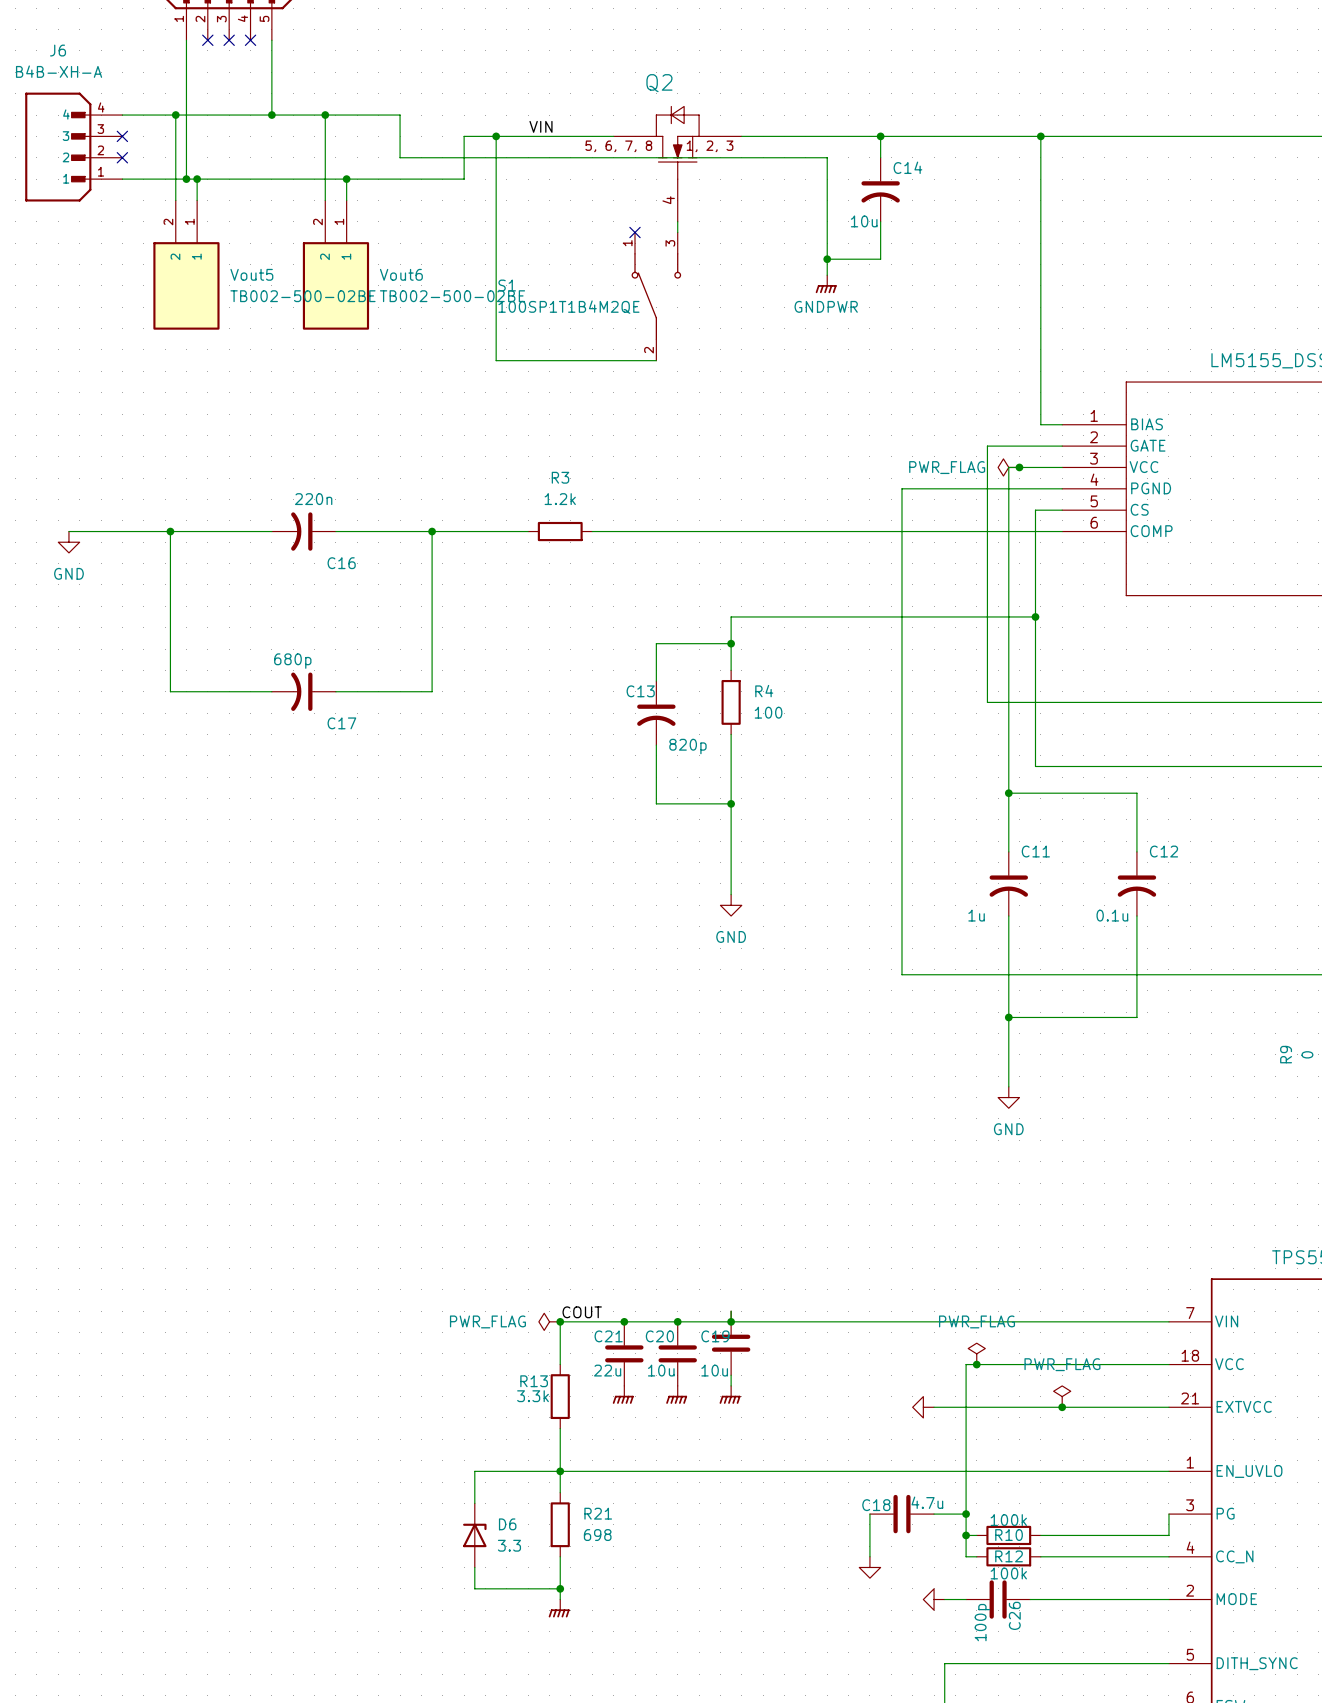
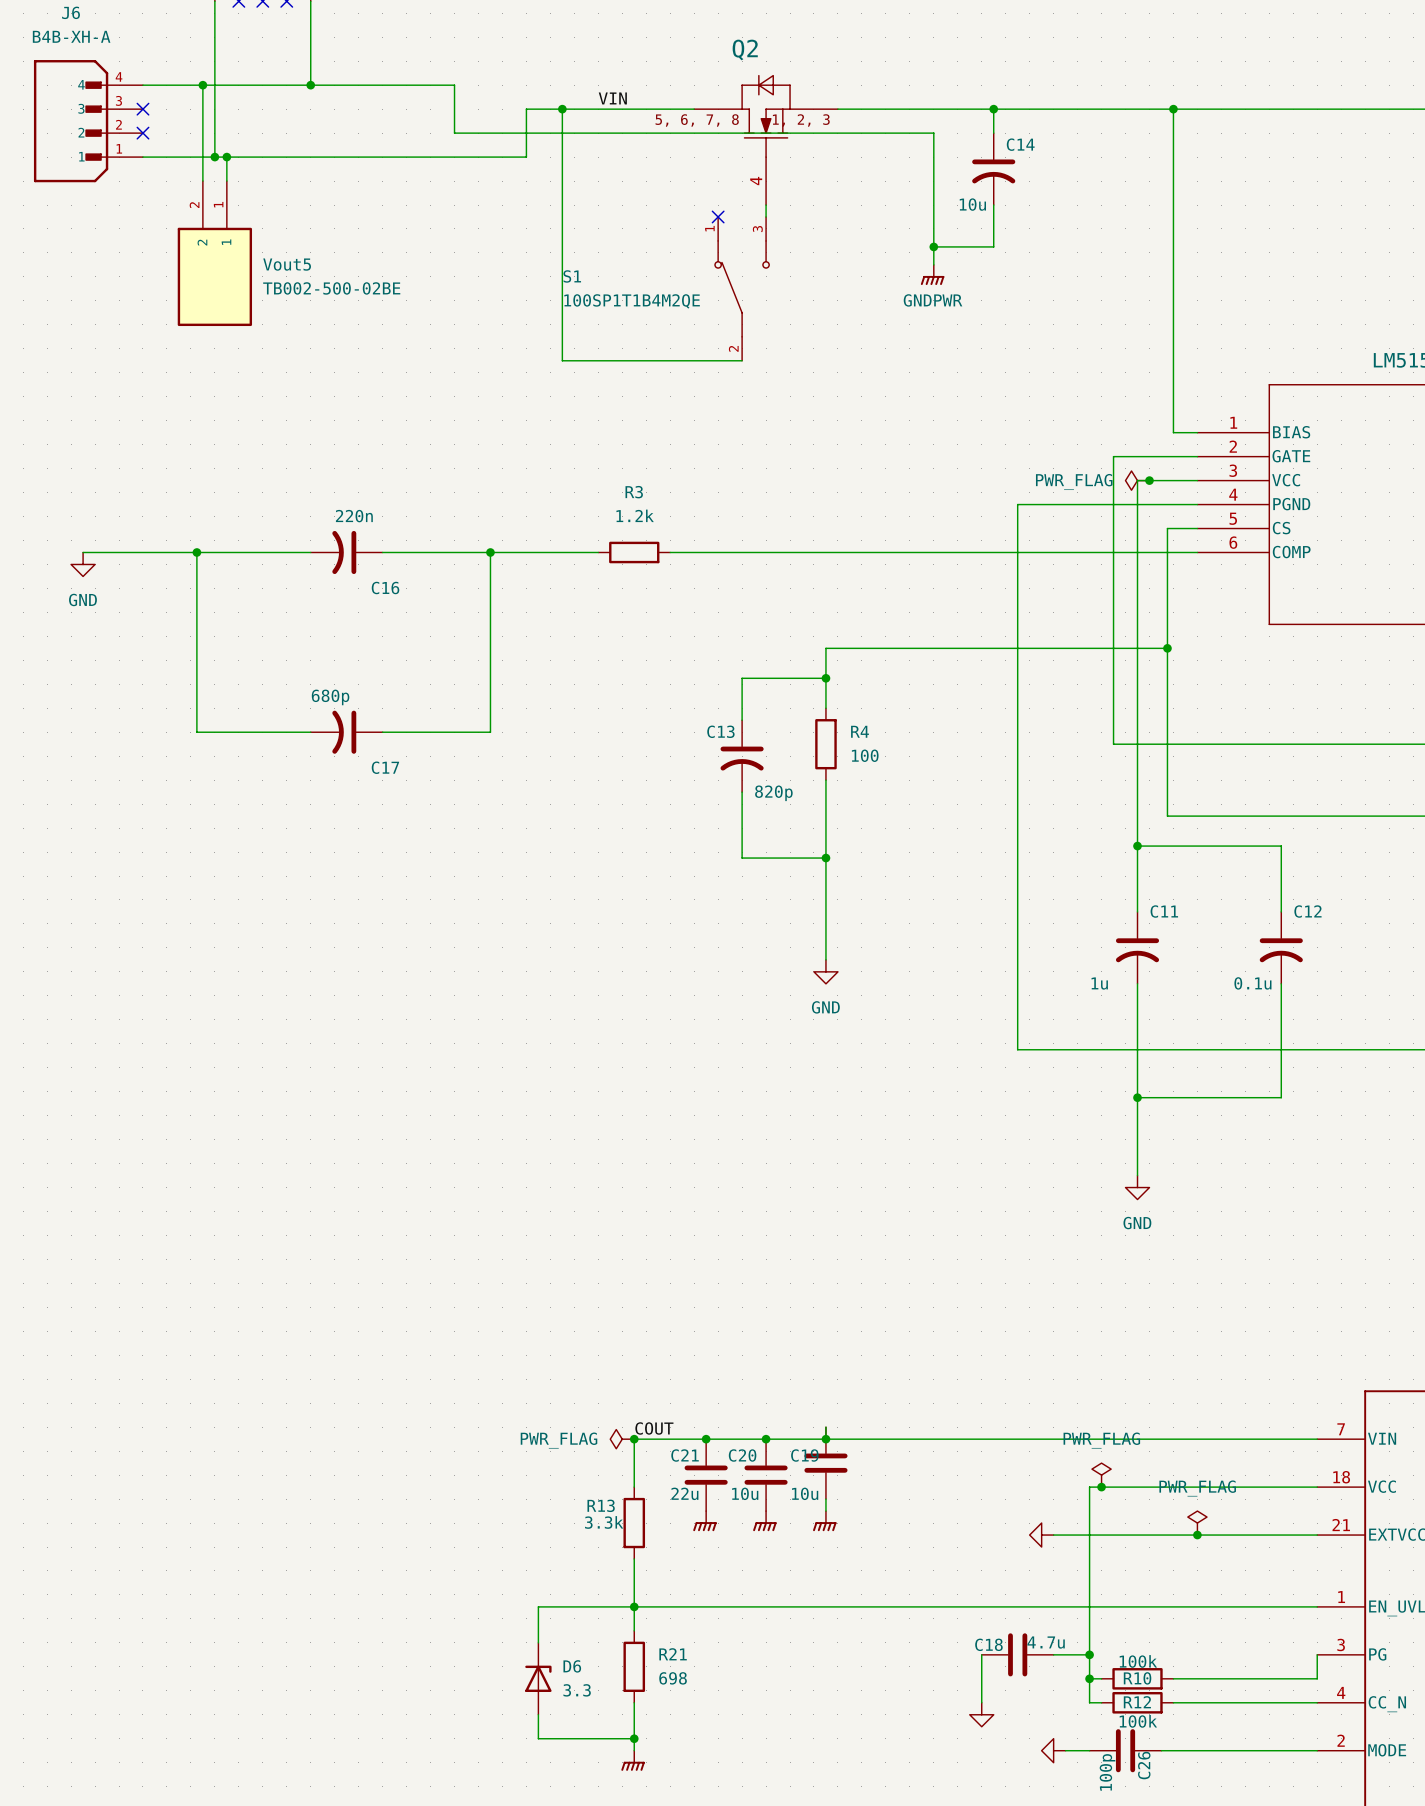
wire: (325, 115) (325, 200) -> none
junction: (325, 115) -> none
wire: (346, 179) (346, 200) -> none
junction: (346, 179) -> none
Vout6: TB002-500-02BE (335, 265) -> none

